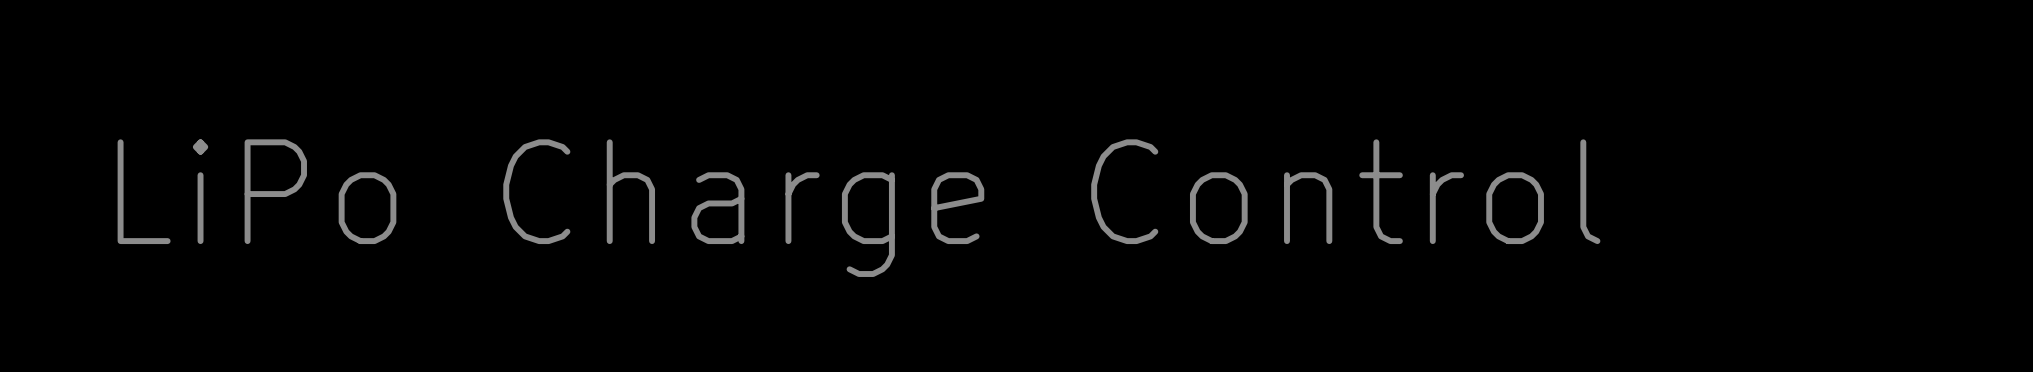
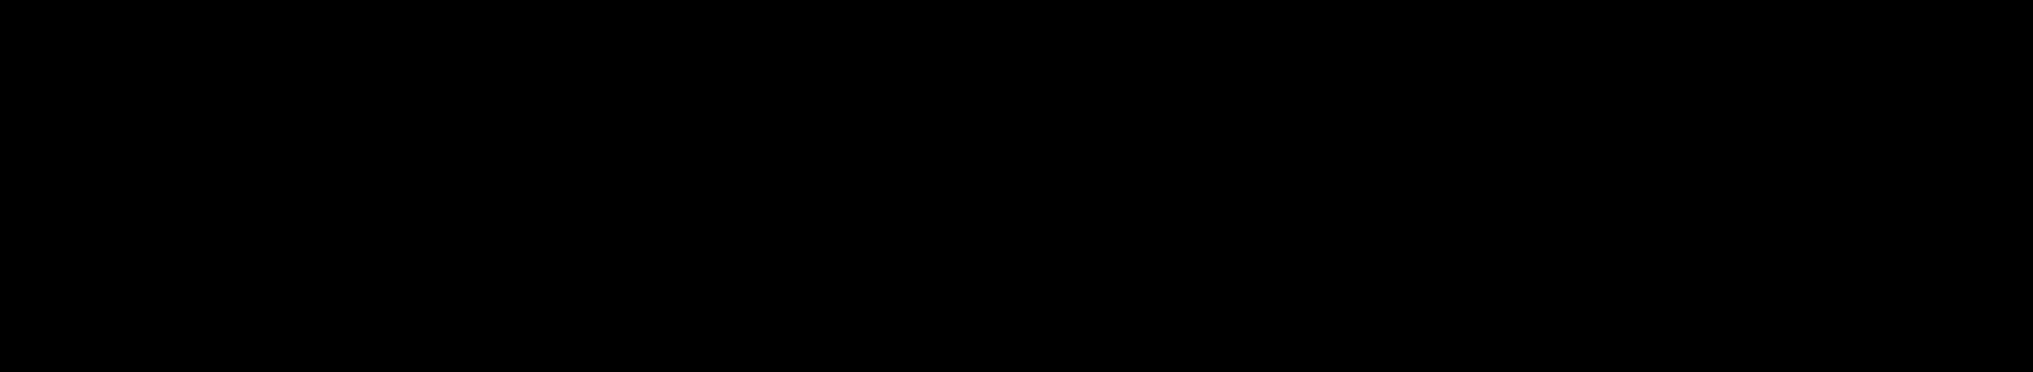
text: LiPo Charge Control (859, 208) -> none

